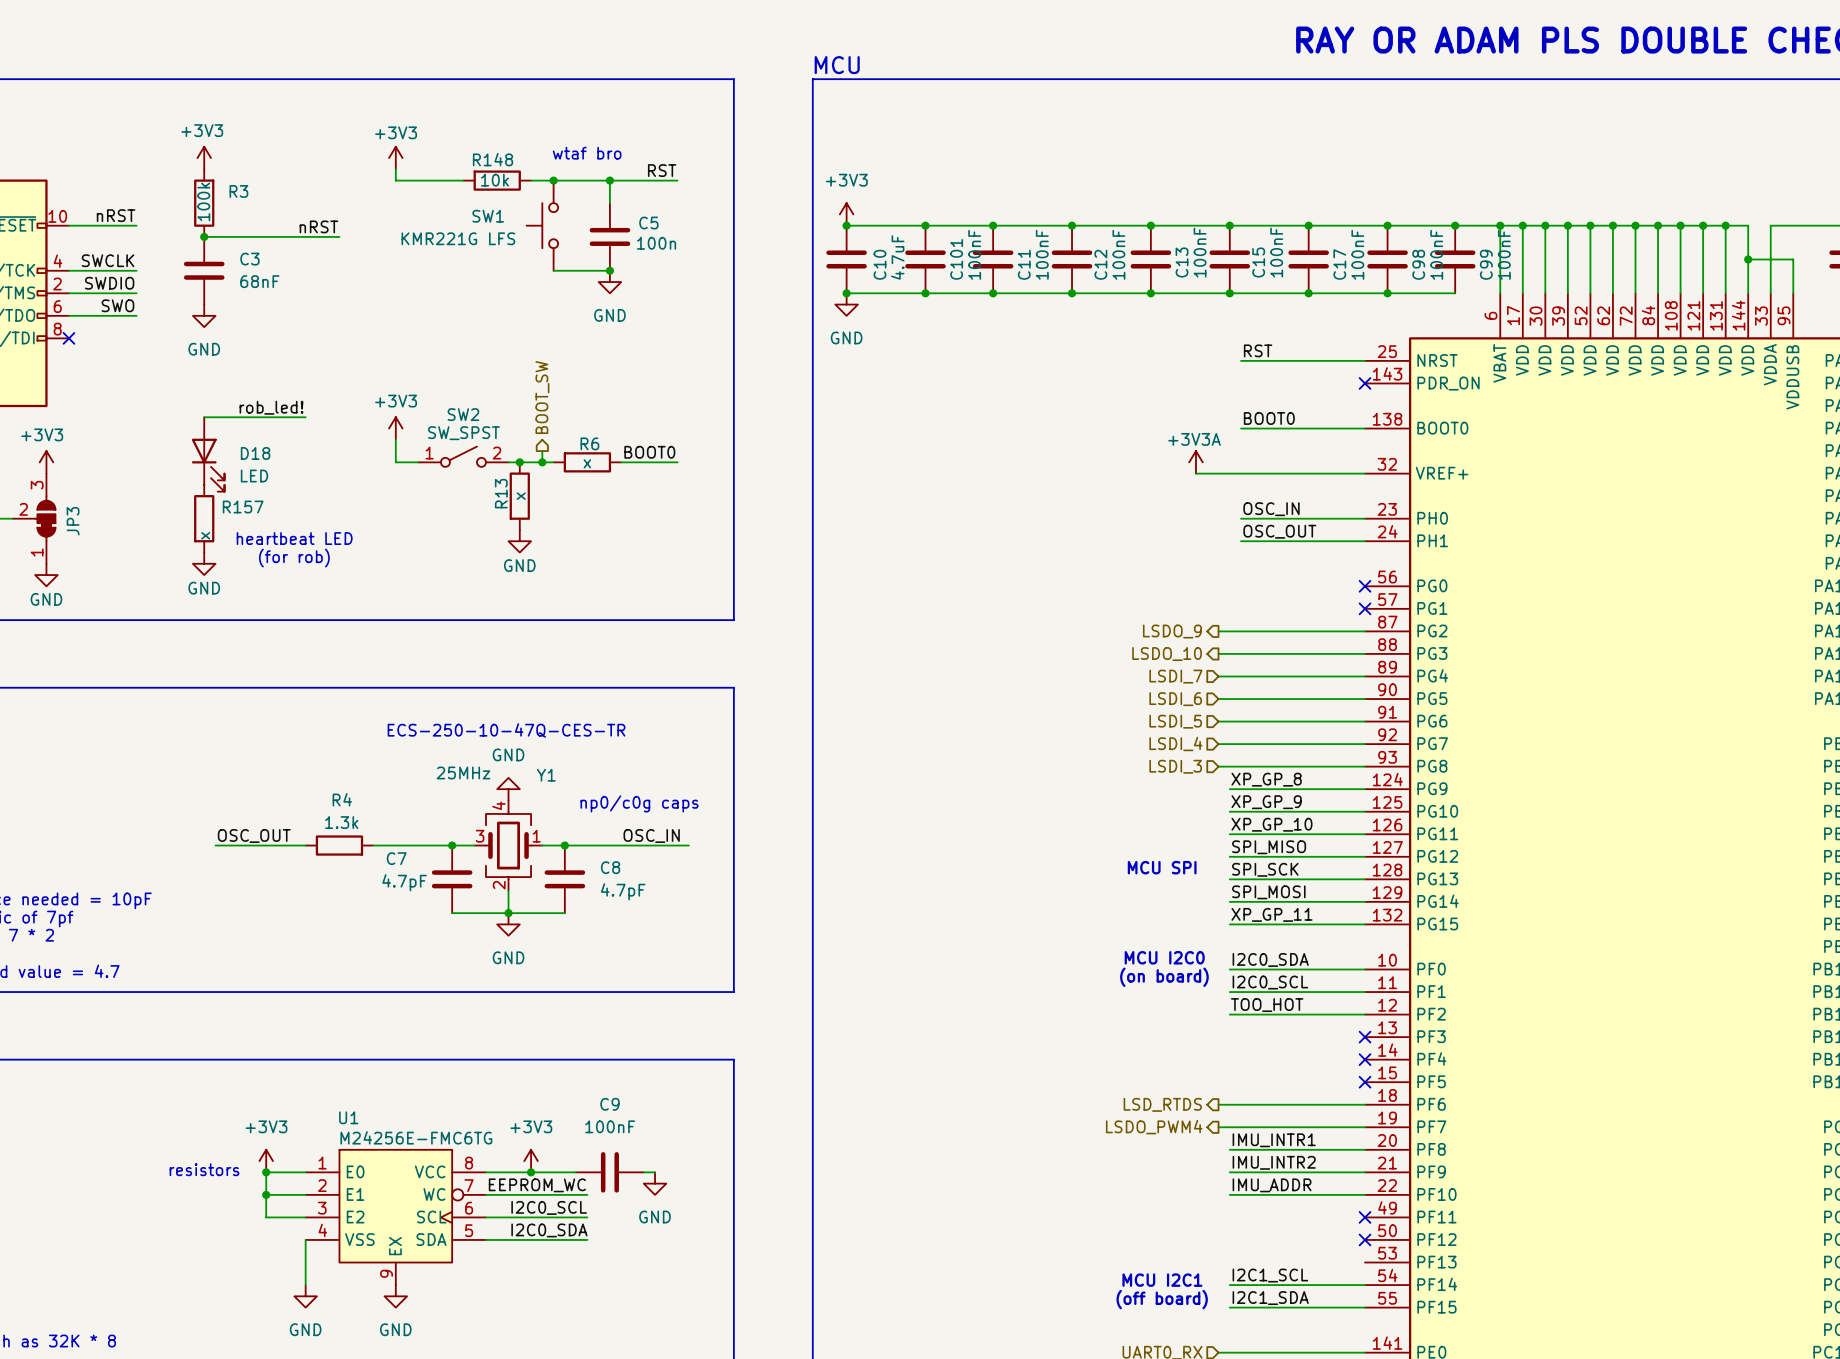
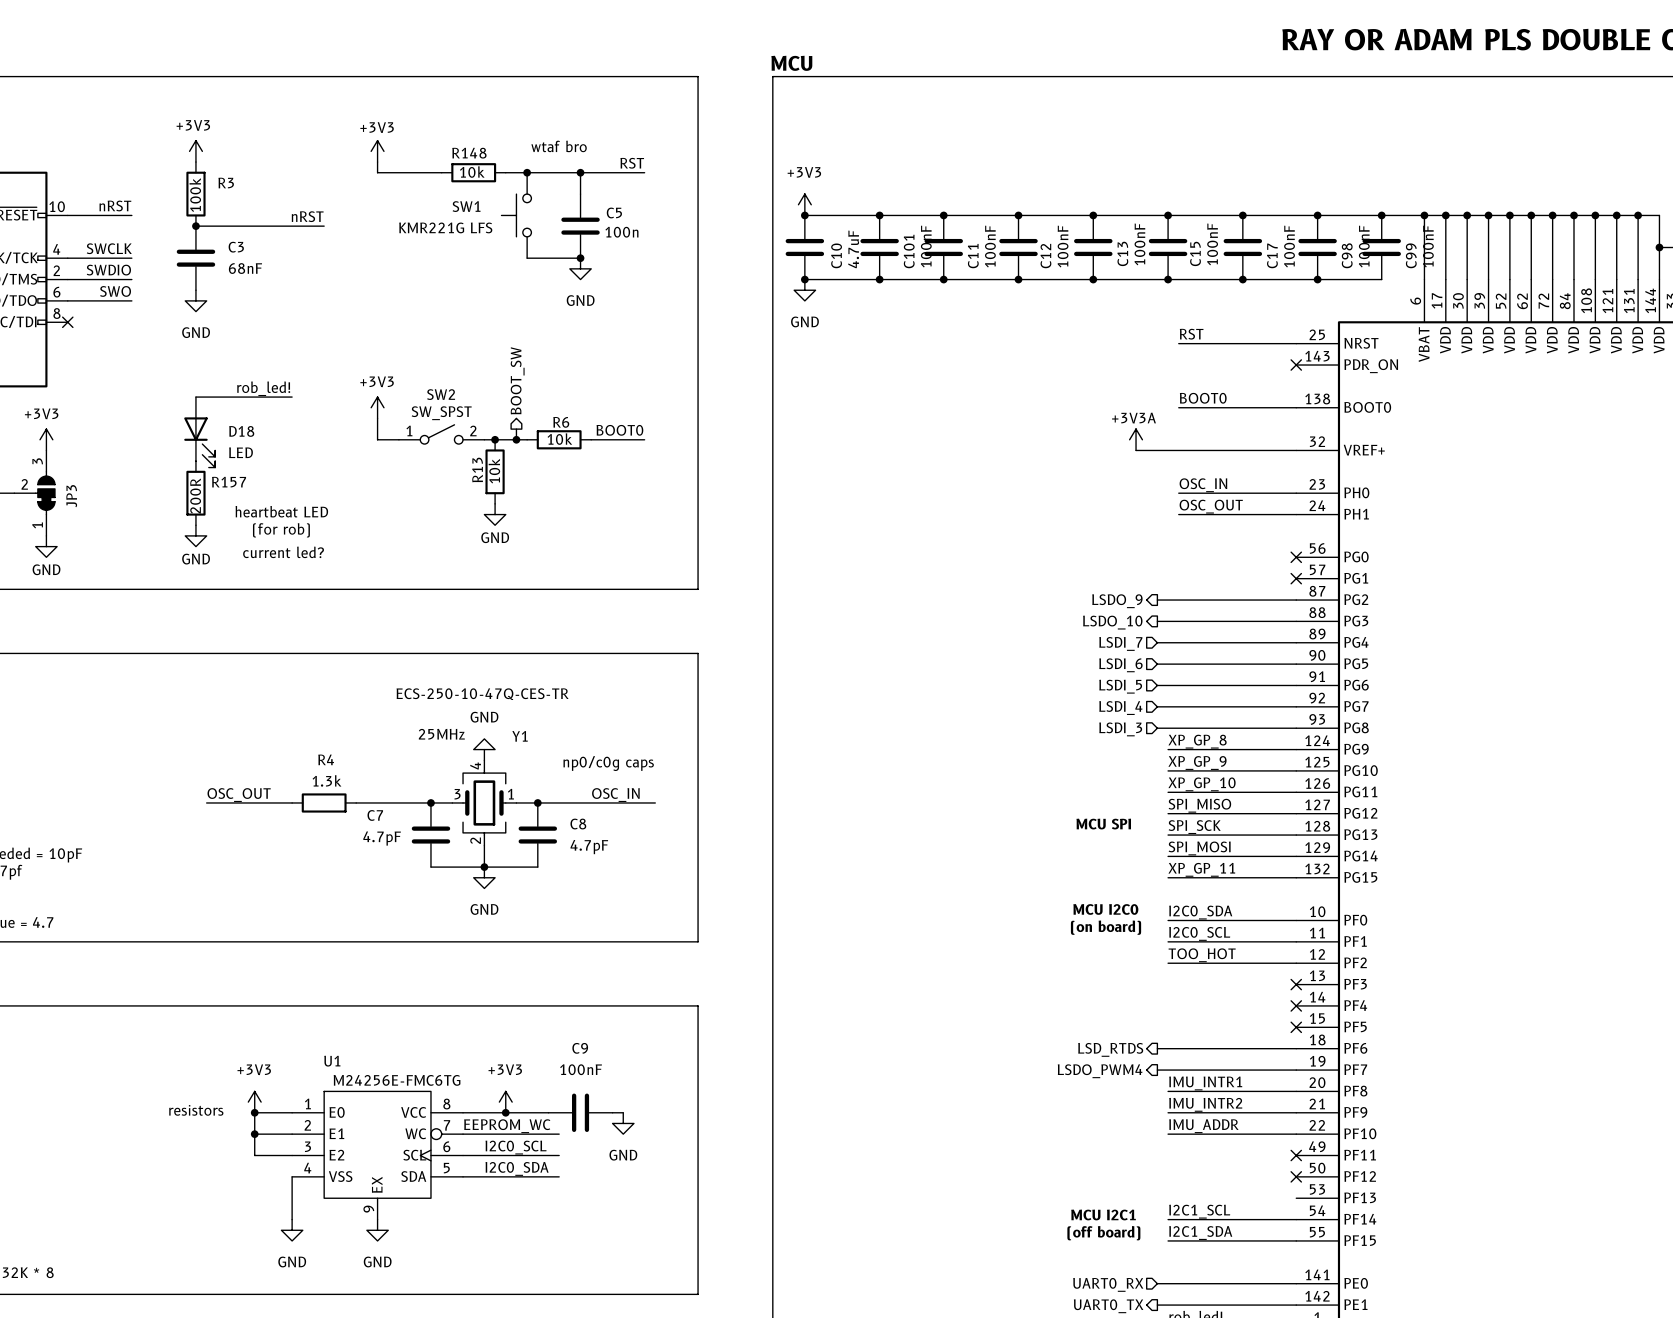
R6 value: x (587, 463) -> 10k (559, 439)
R13 value: x (521, 496) -> 10k (494, 471)
R157 value: x (205, 535) -> 200R (195, 495)
text: none -> current led? (283, 552)

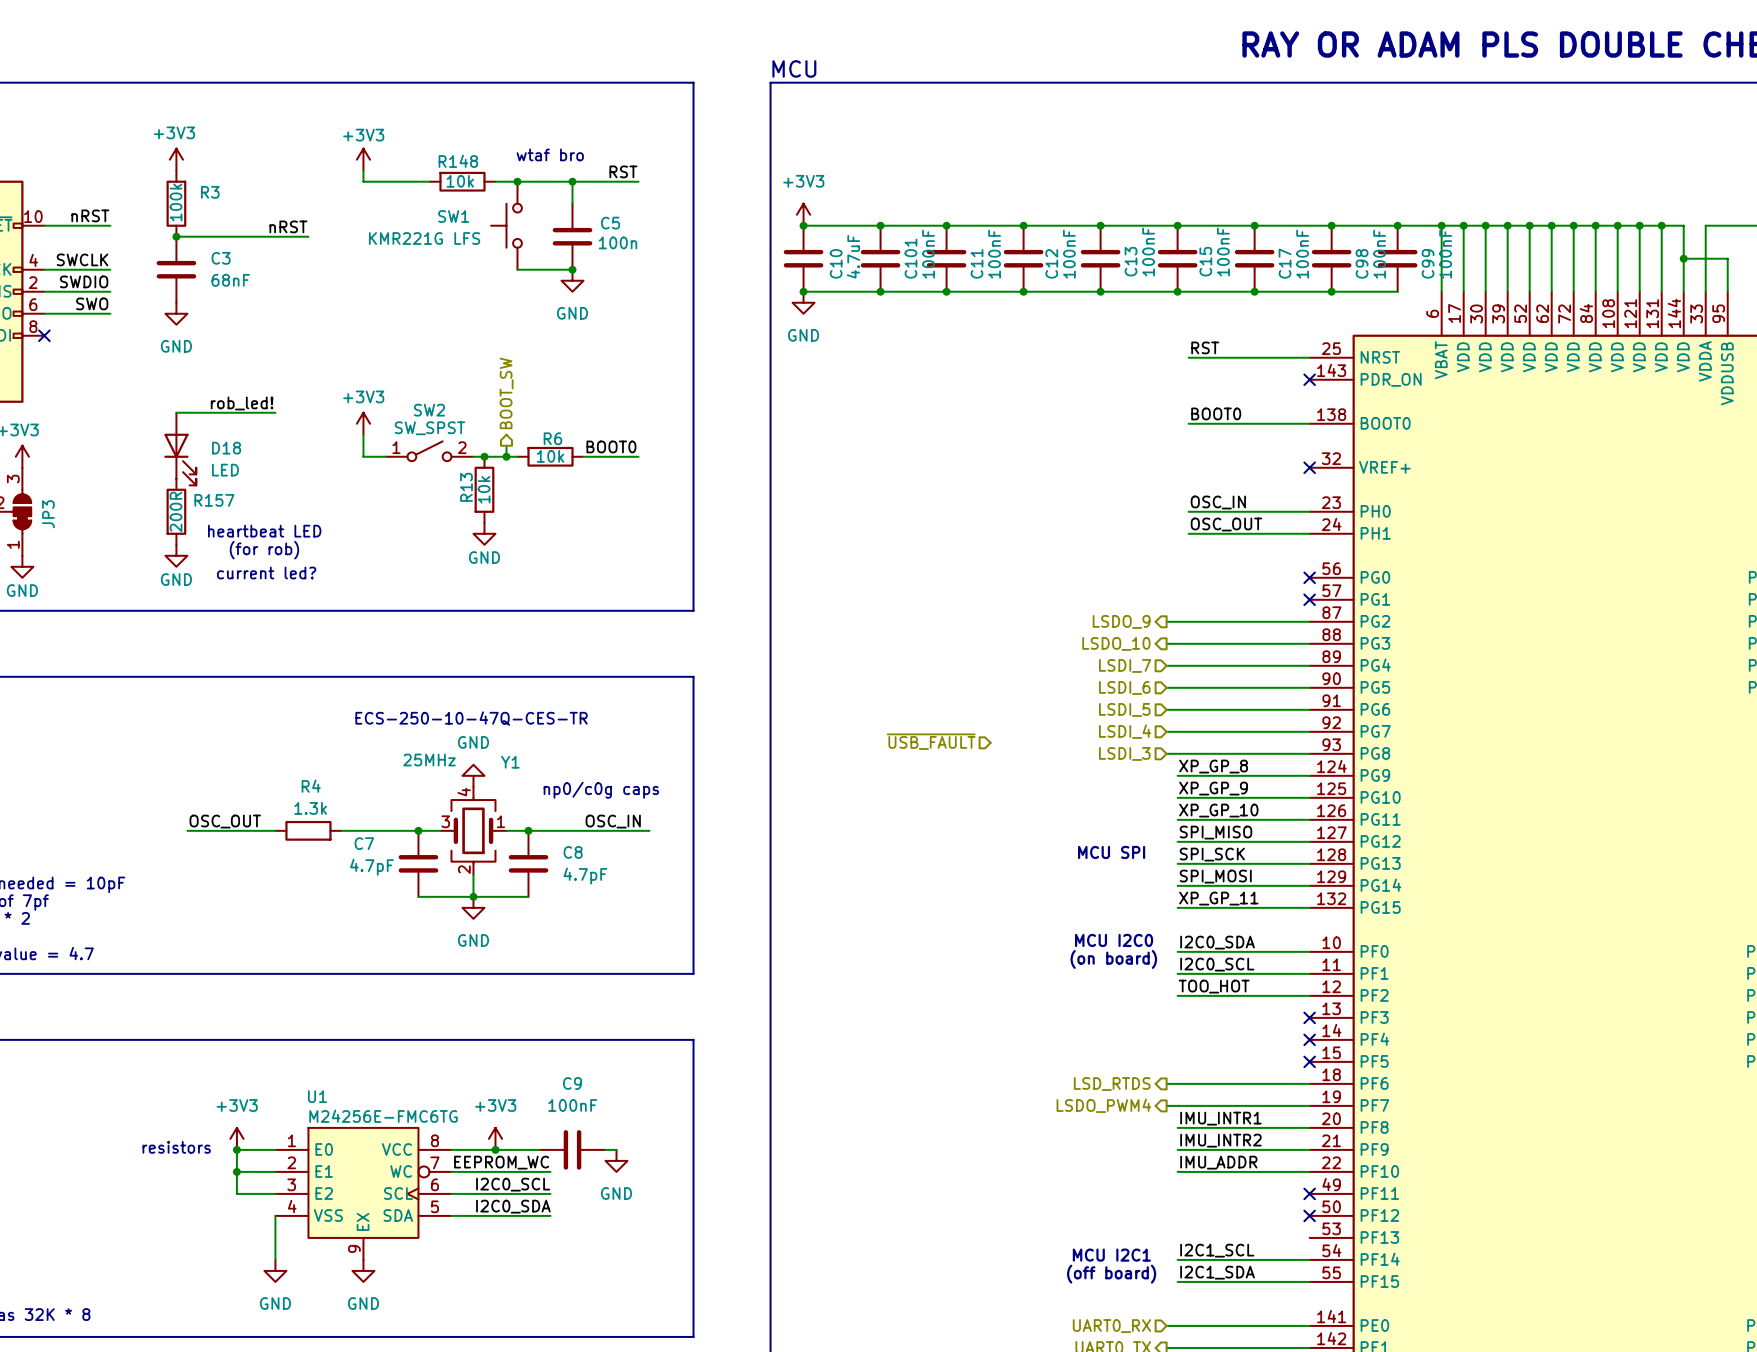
power symbol: +3V3A (1136, 439) -> none
wire: (1136, 450) (1296, 450) -> none
no-connect mark: none -> (1309, 467)
hierarchical label: none -> ~{USB_FAULT} (931, 741)

